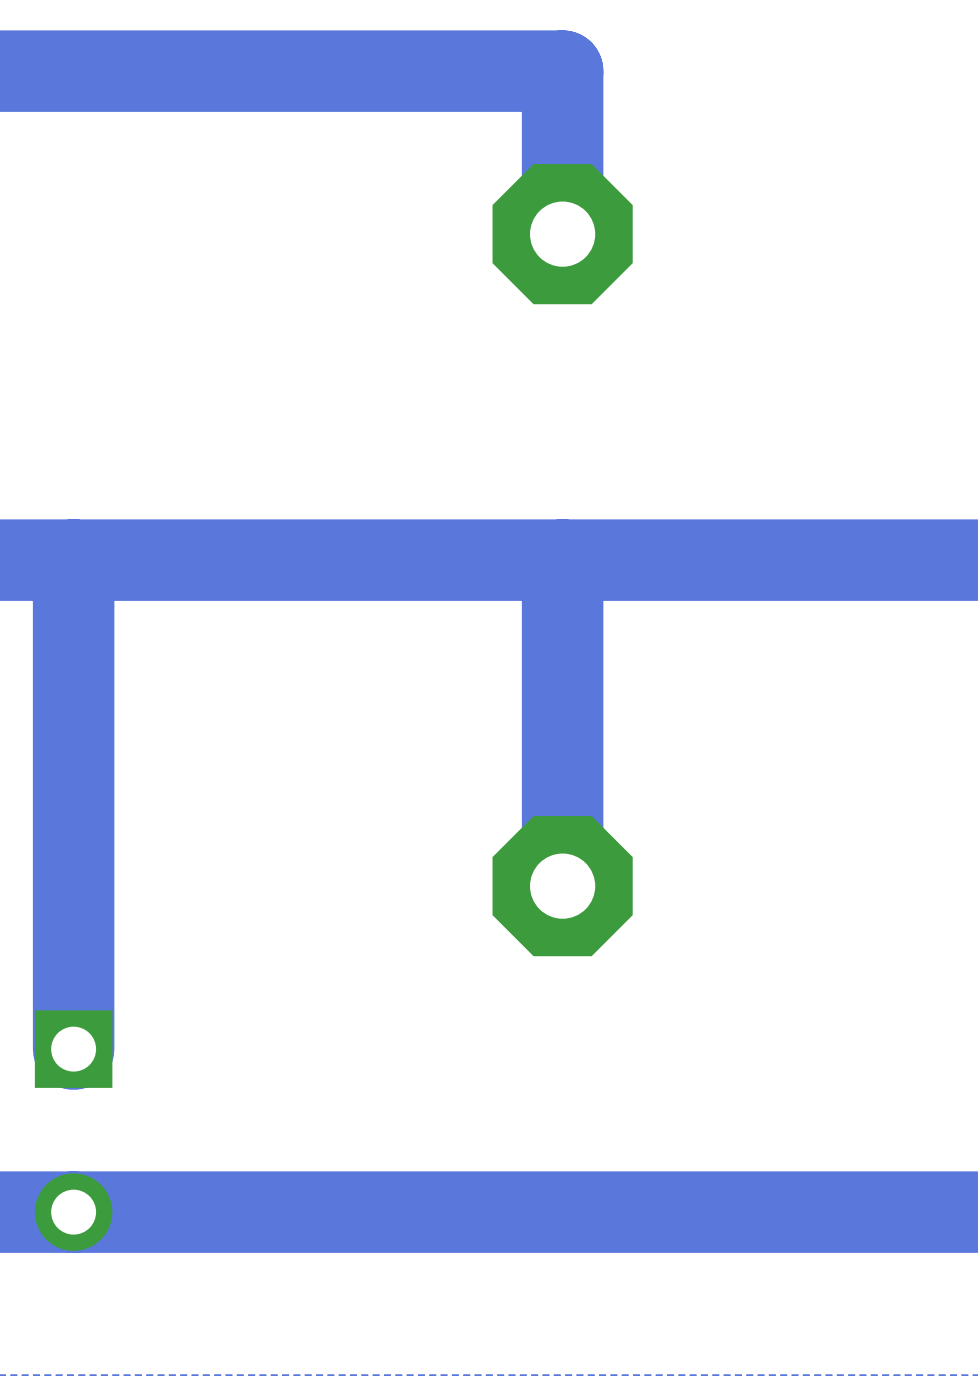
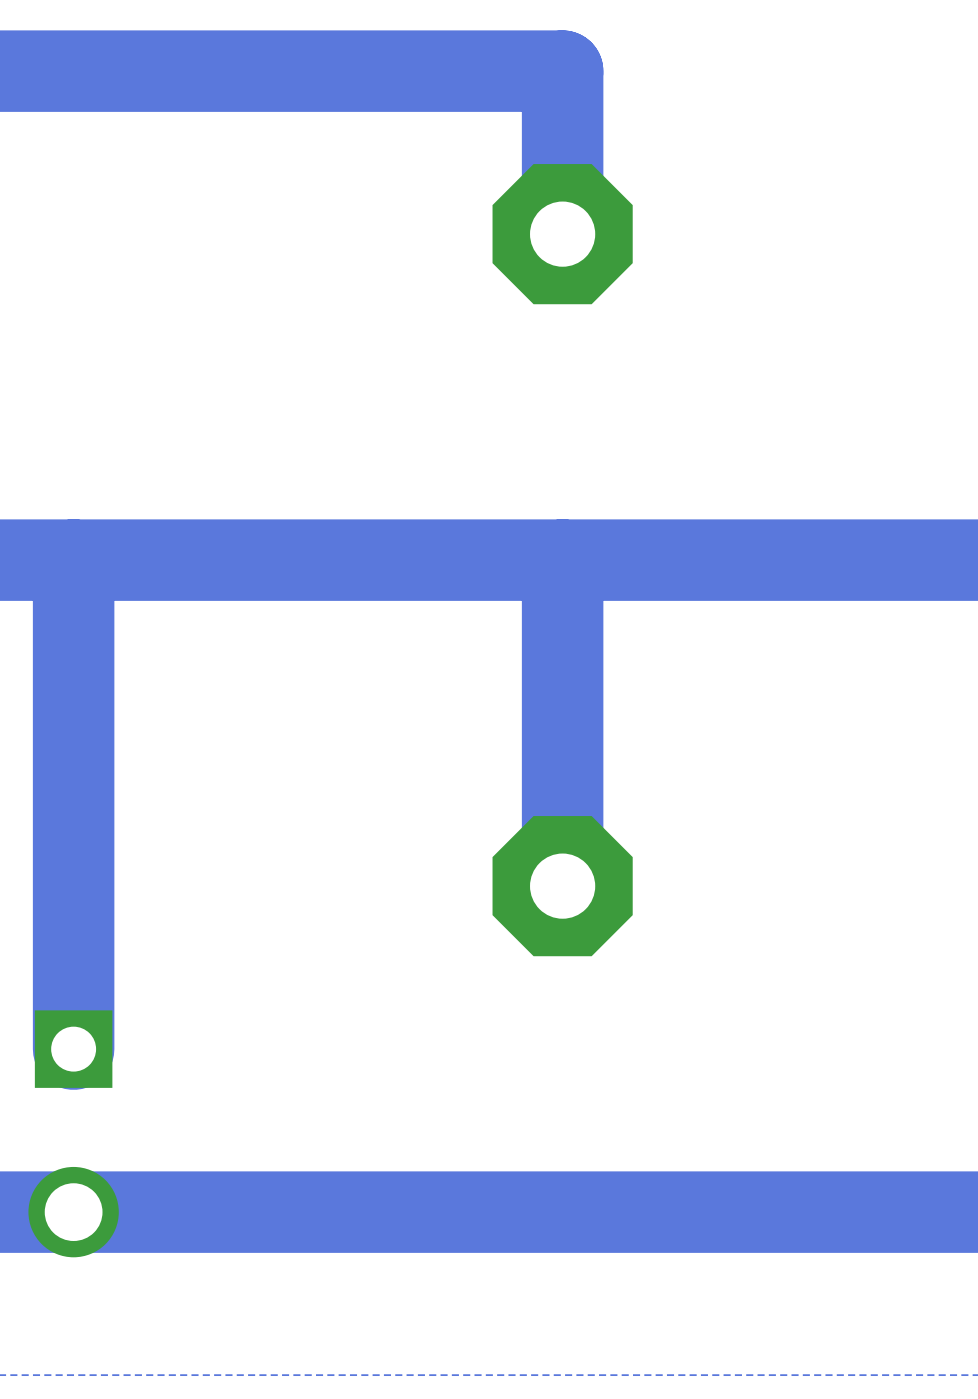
part footprint: [34, 1010, 113, 1251] -> [28, 1010, 119, 1258]

